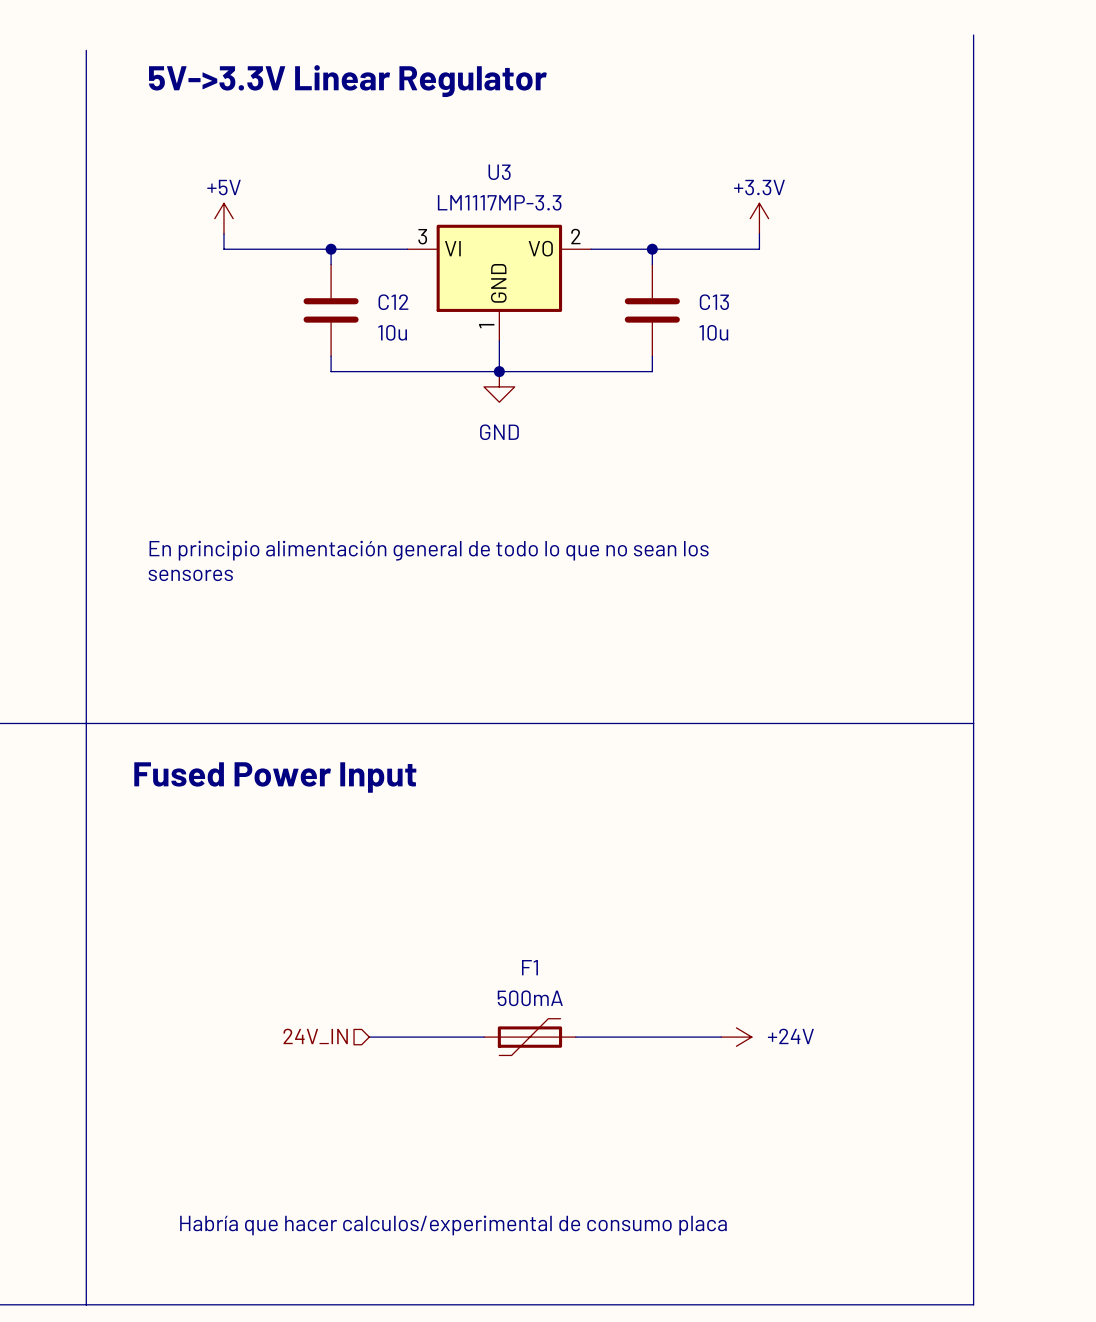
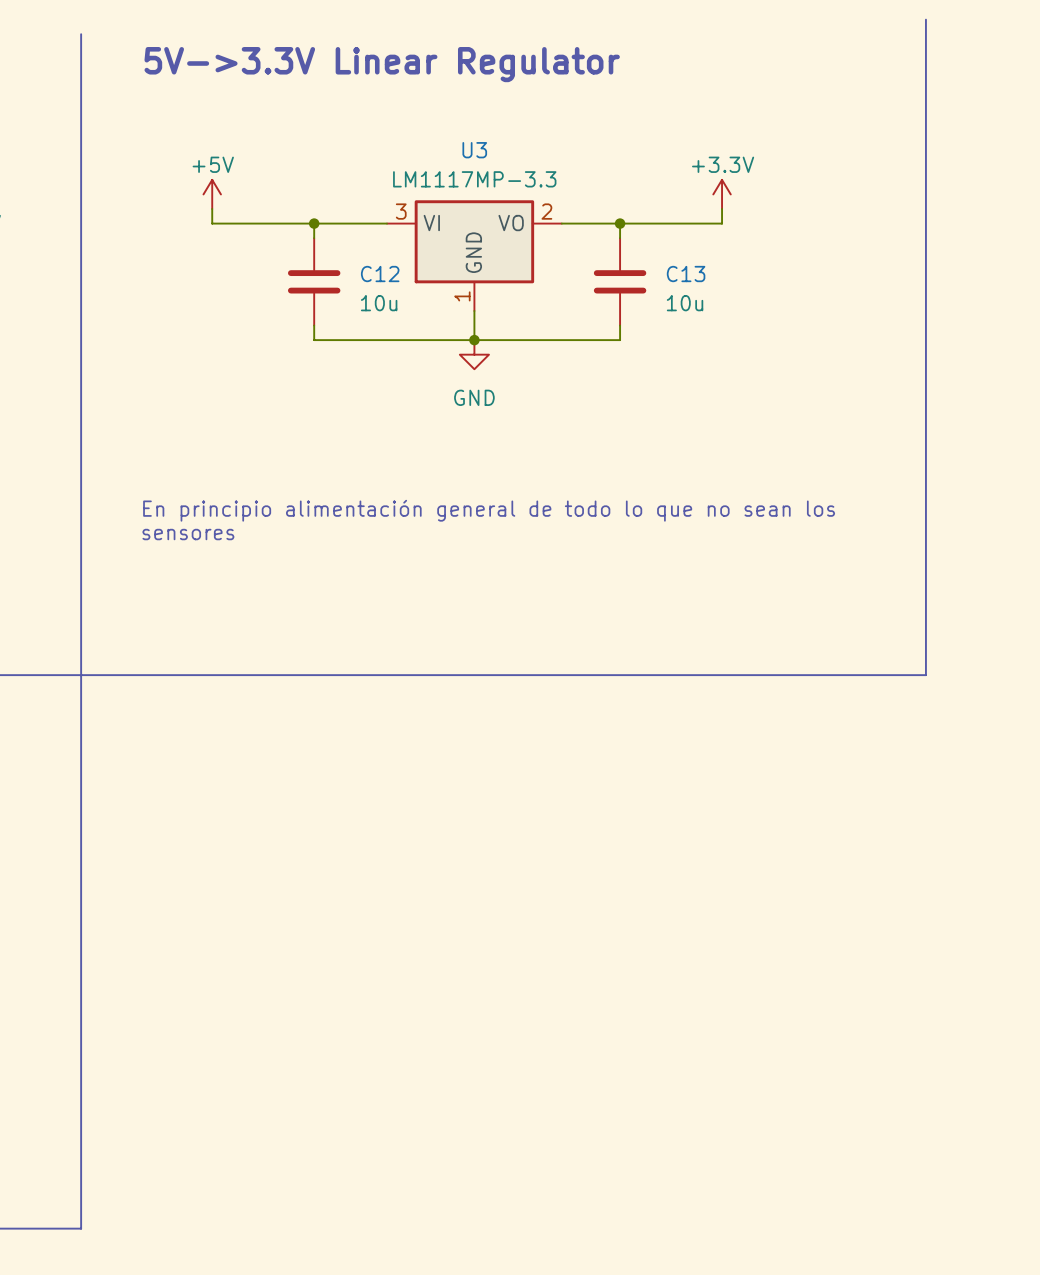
line: (973, 723) (973, 1304) (86, 1304) -> none
text: Fused Power Input (275, 777) -> none
hierarchical label: 24V_IN (315, 1036) -> none
wire: (369, 1037) (484, 1037) -> none
F1: 500mA (529, 1037) -> none
wire: (575, 1037) (721, 1037) -> none
power symbol: +24V (736, 1037) -> none
text: Habría que hacer calculos/experimental de consumo placa (453, 1225) -> none

